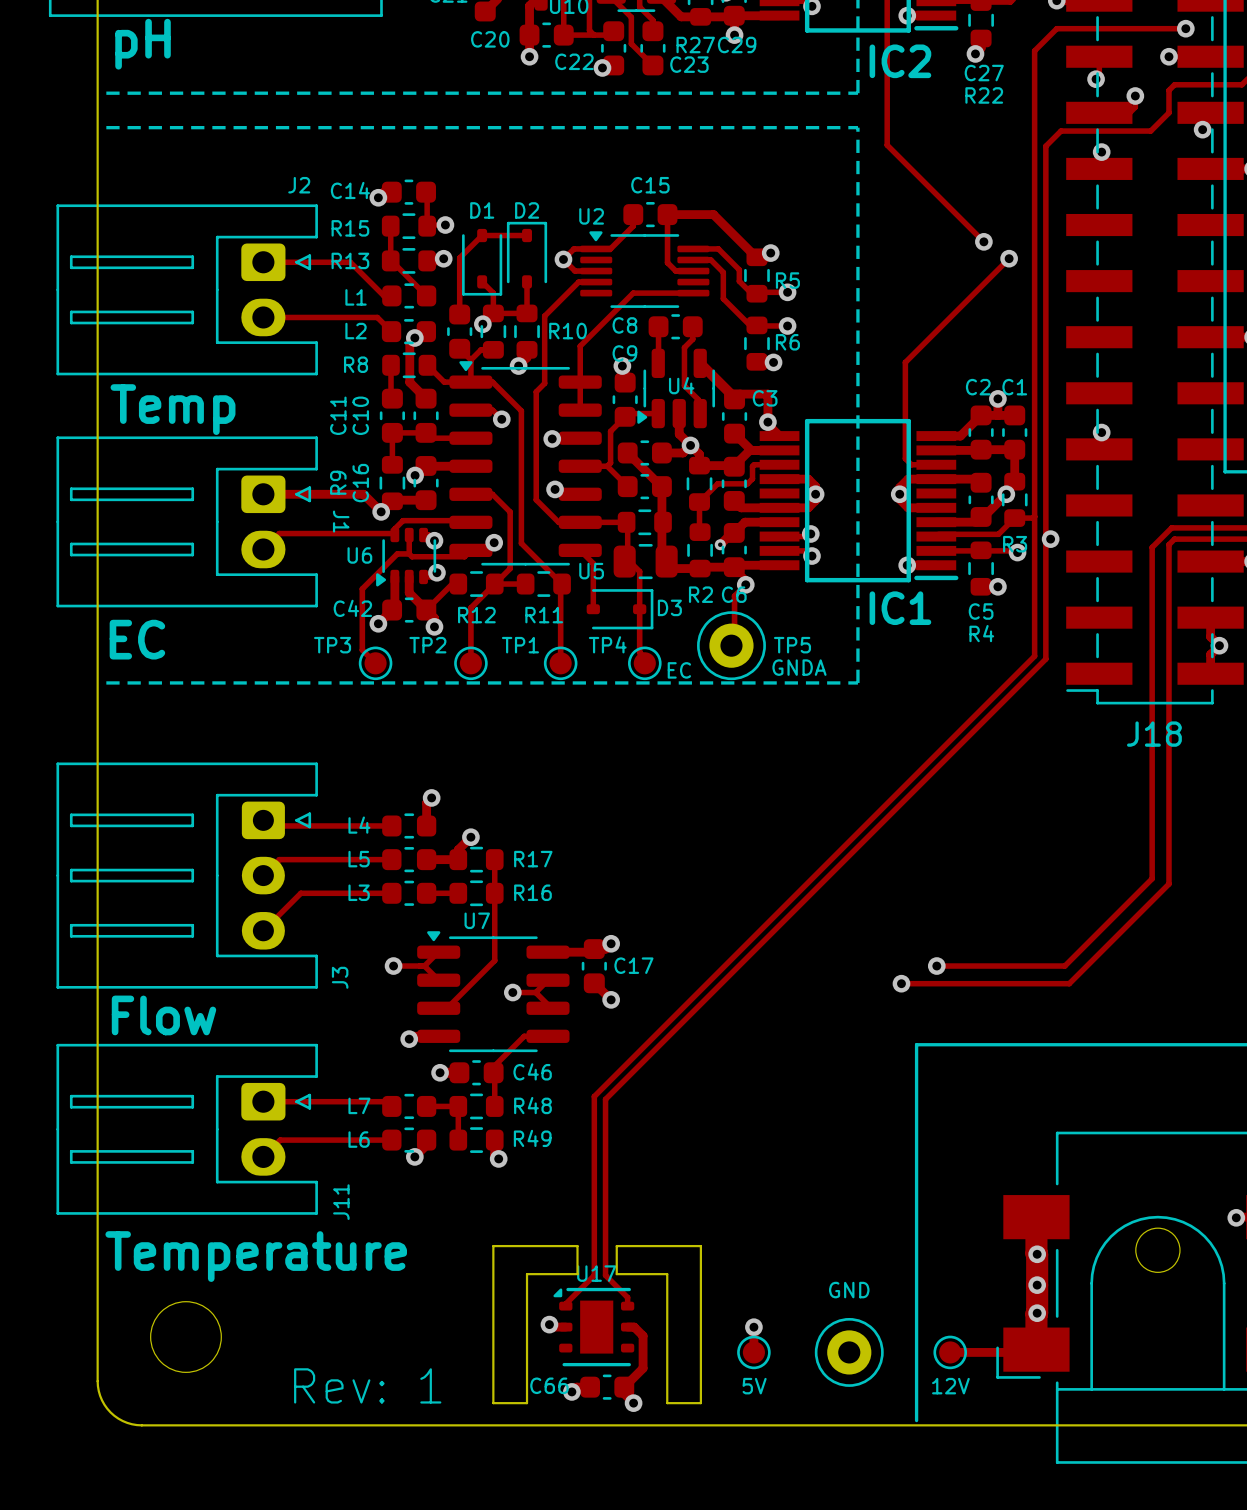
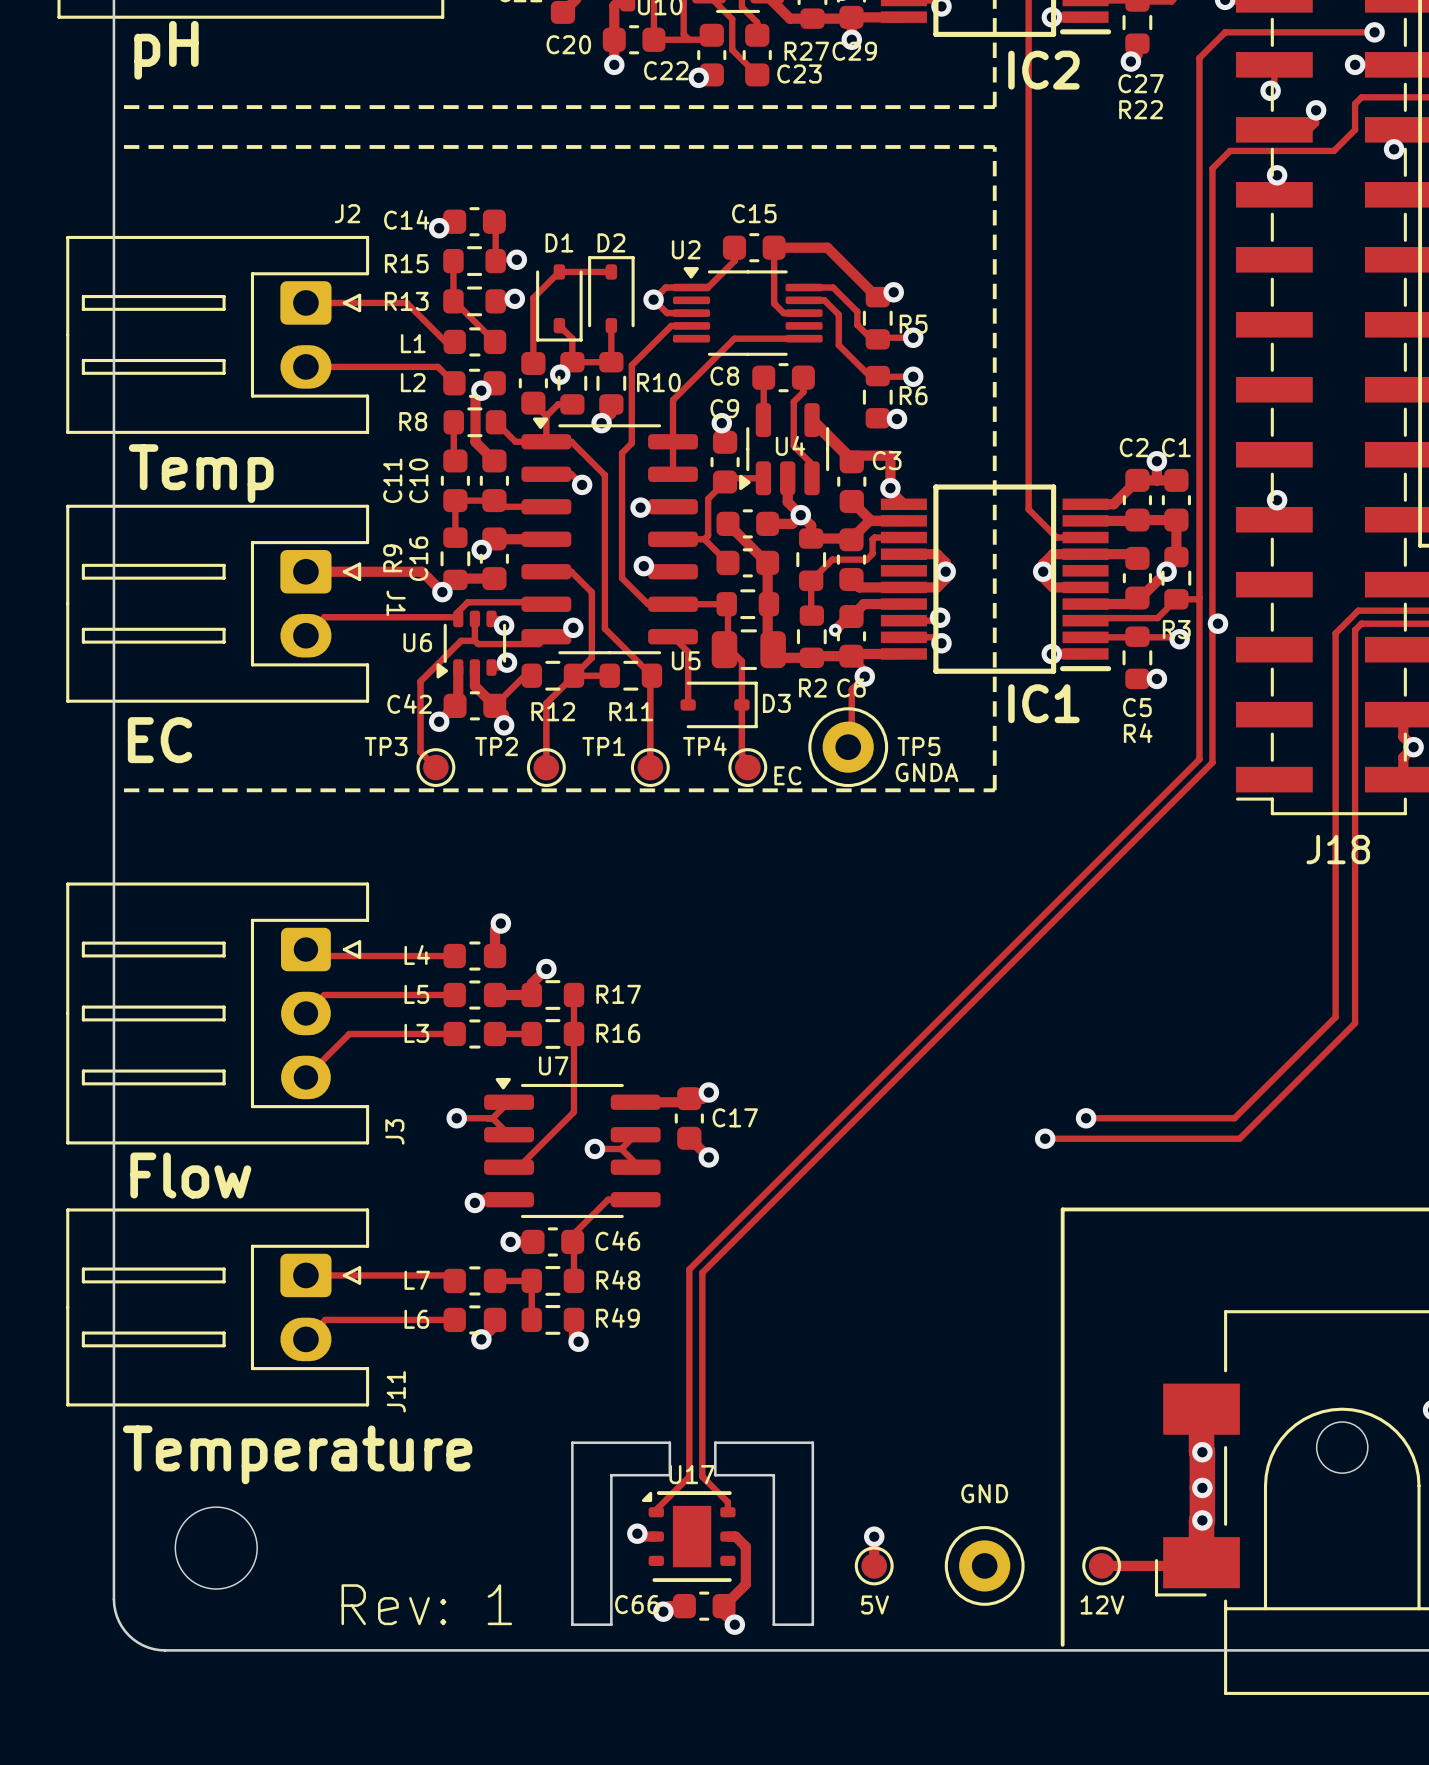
track: (887, 145) (983, 241) -> none
via: (983, 241) -> none
track: (1009, 258) (905, 362) (905, 458) -> (1028, 167) (1028, 509) (1049, 530)
via: (1009, 258) -> none

